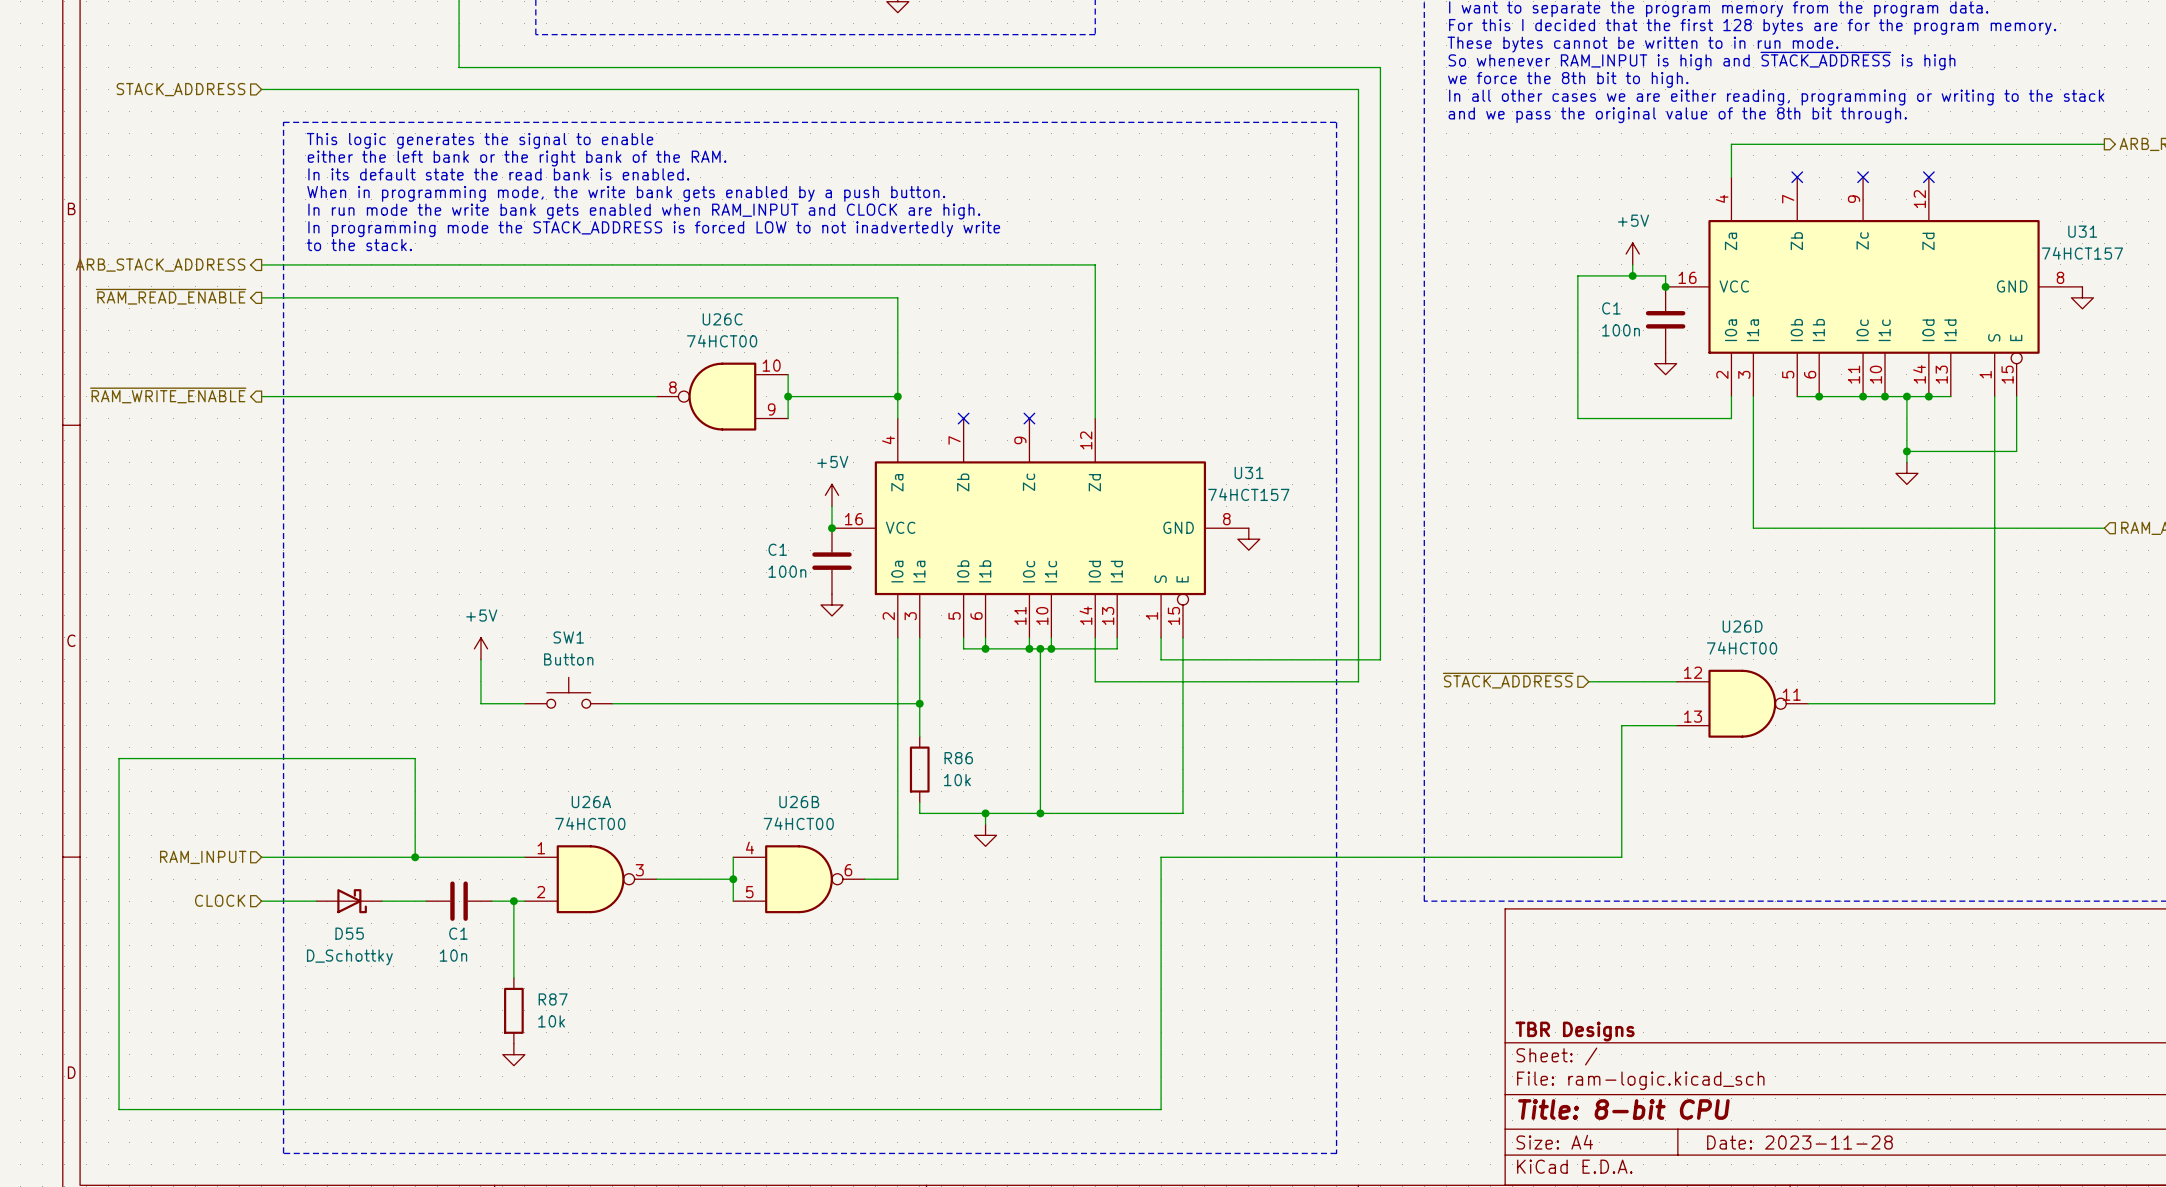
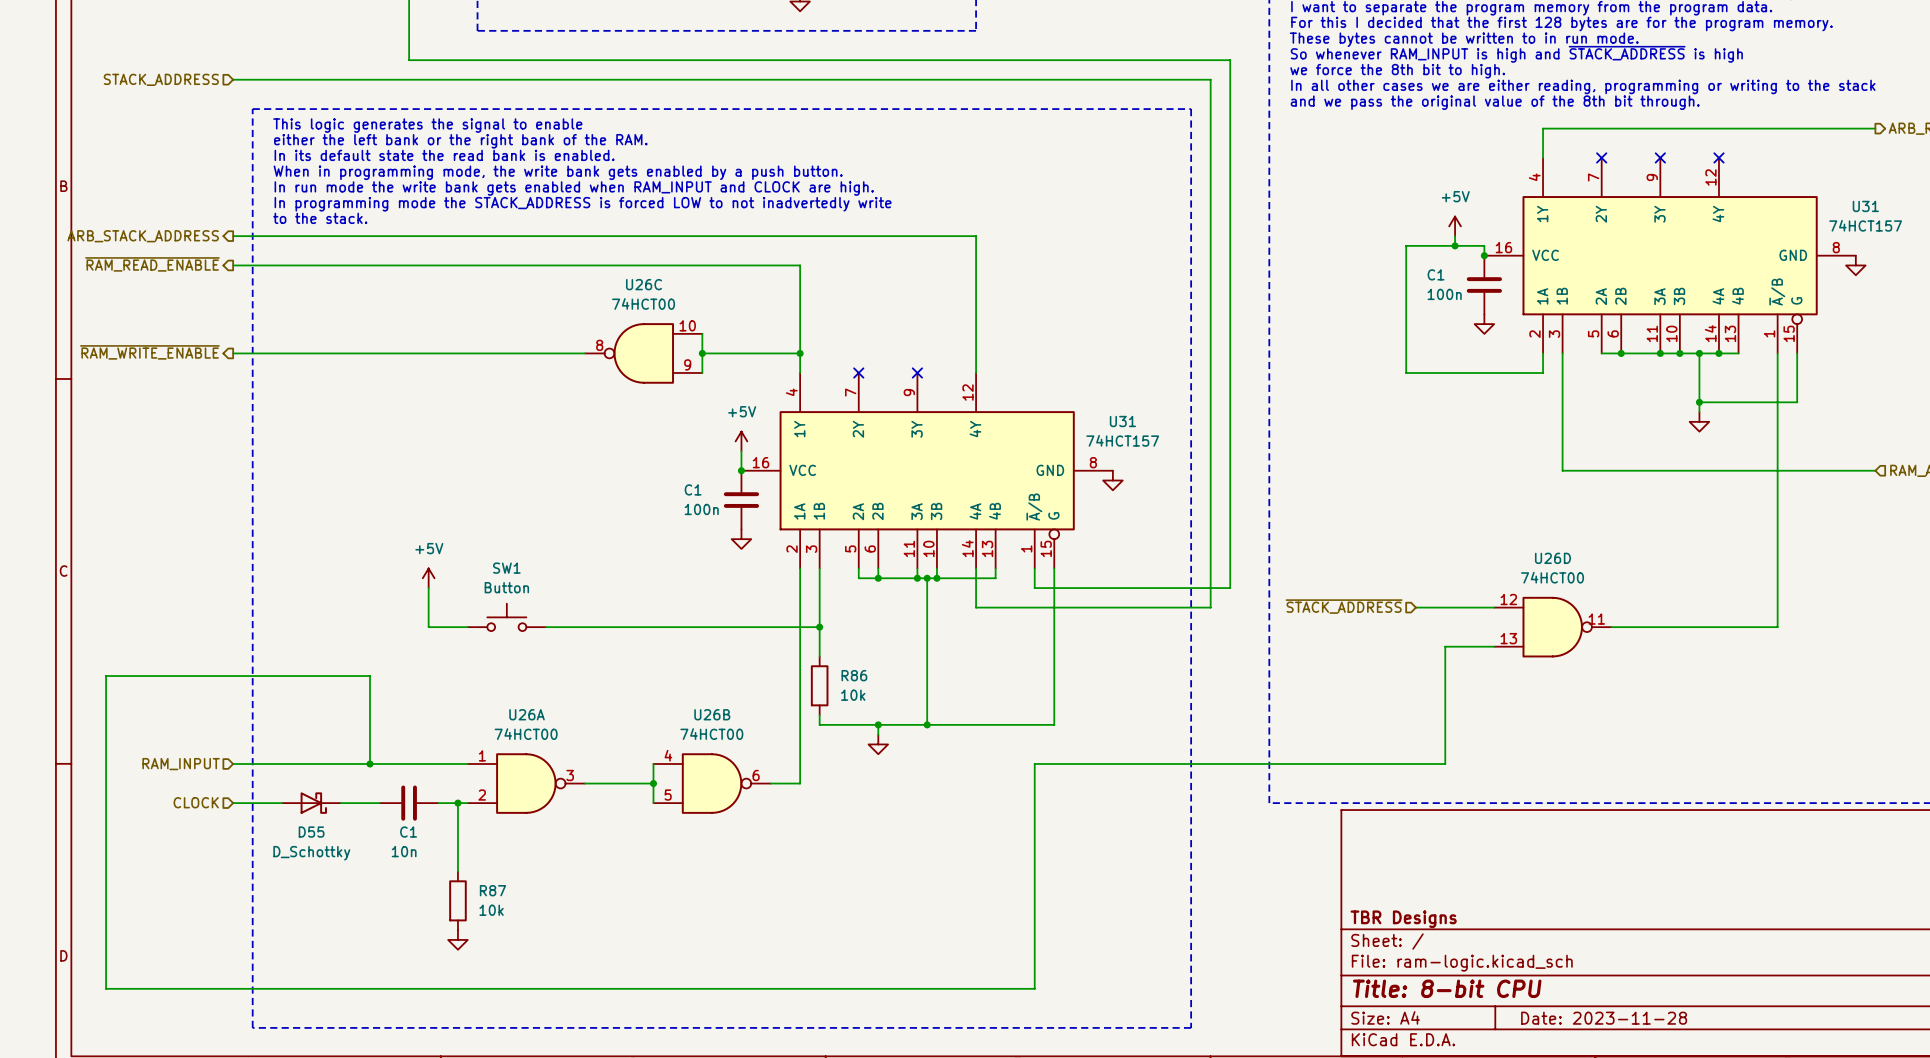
U31 symbol: [1665, 177, 2083, 397] -> [1484, 157, 1856, 354]
U31 symbol: [831, 418, 1249, 638] -> [741, 372, 1113, 569]

